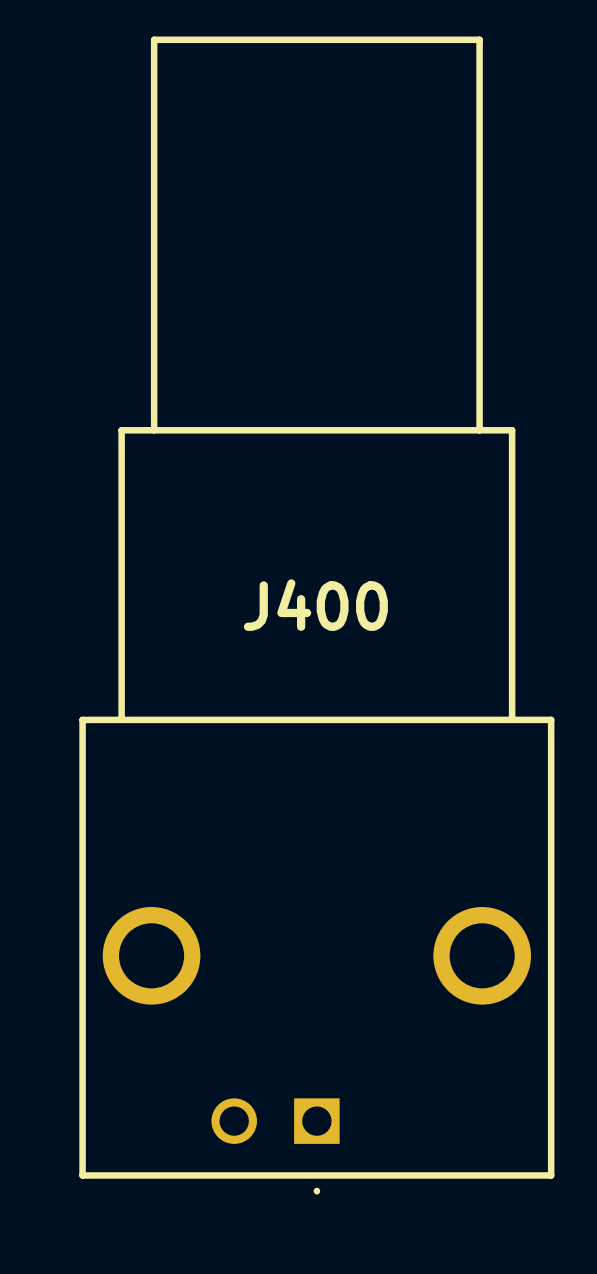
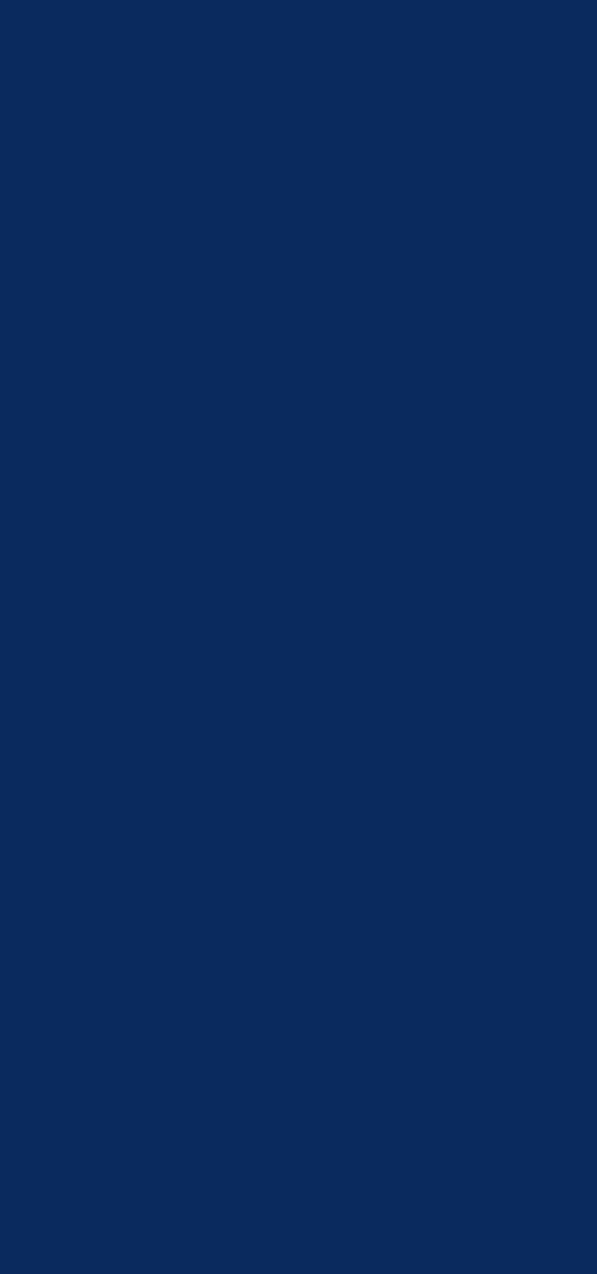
J400: (316, 615) -> none

